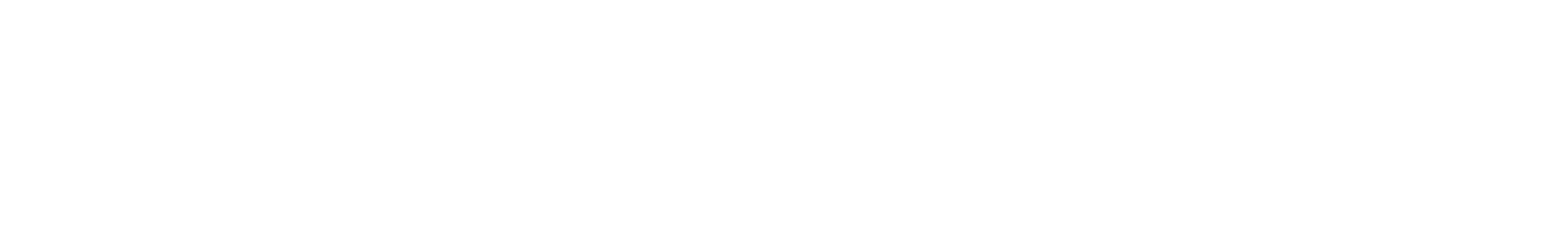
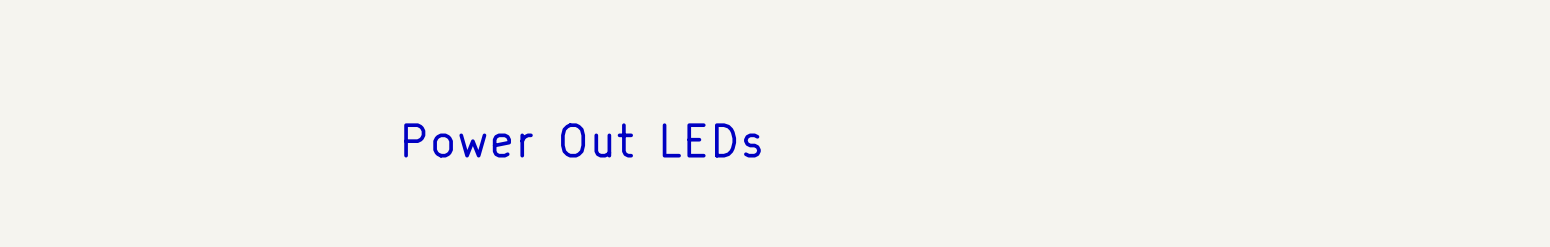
text: none -> Power Out LEDs (582, 140)

